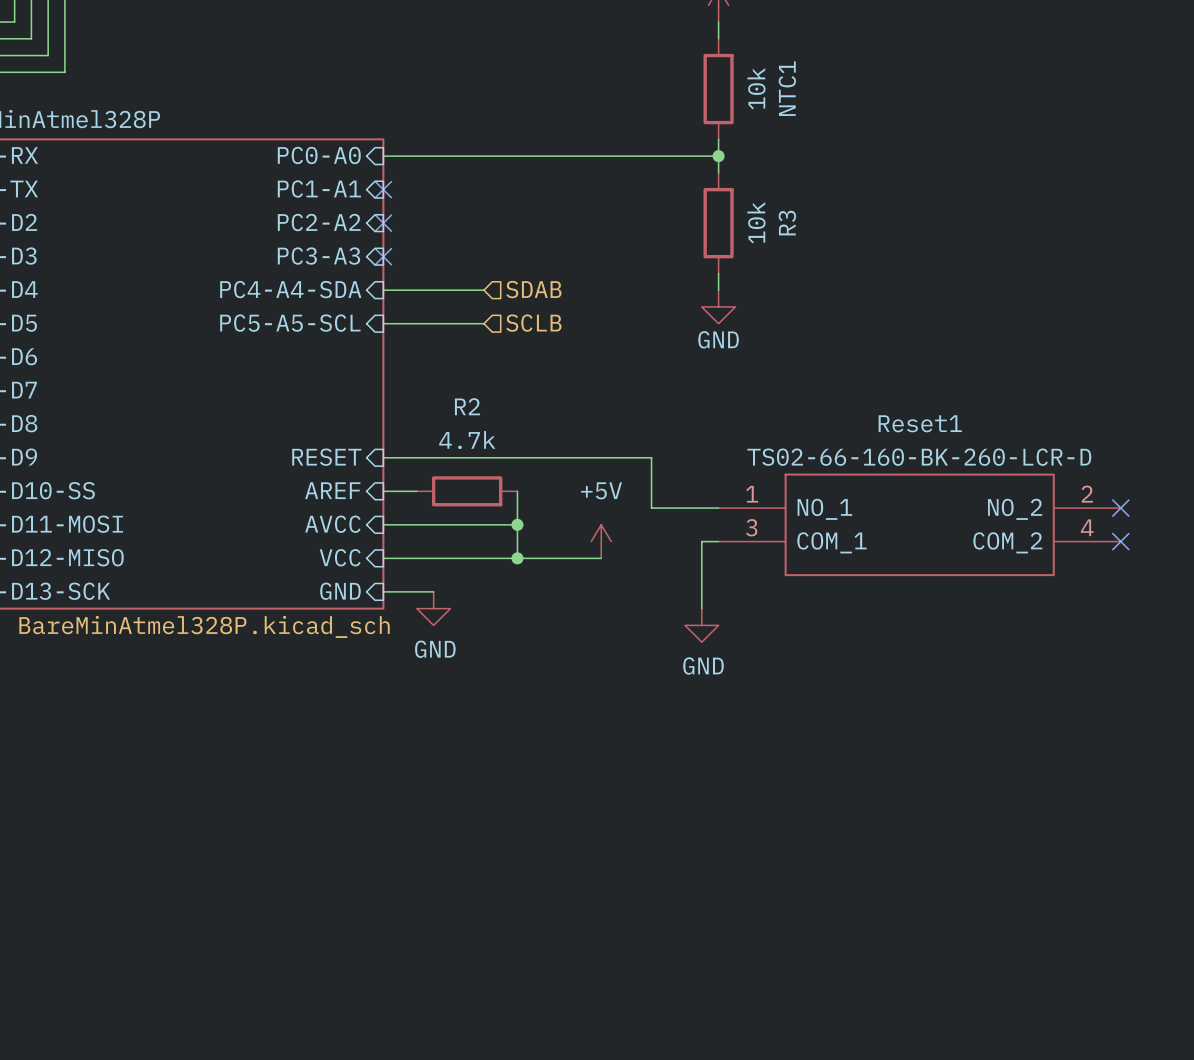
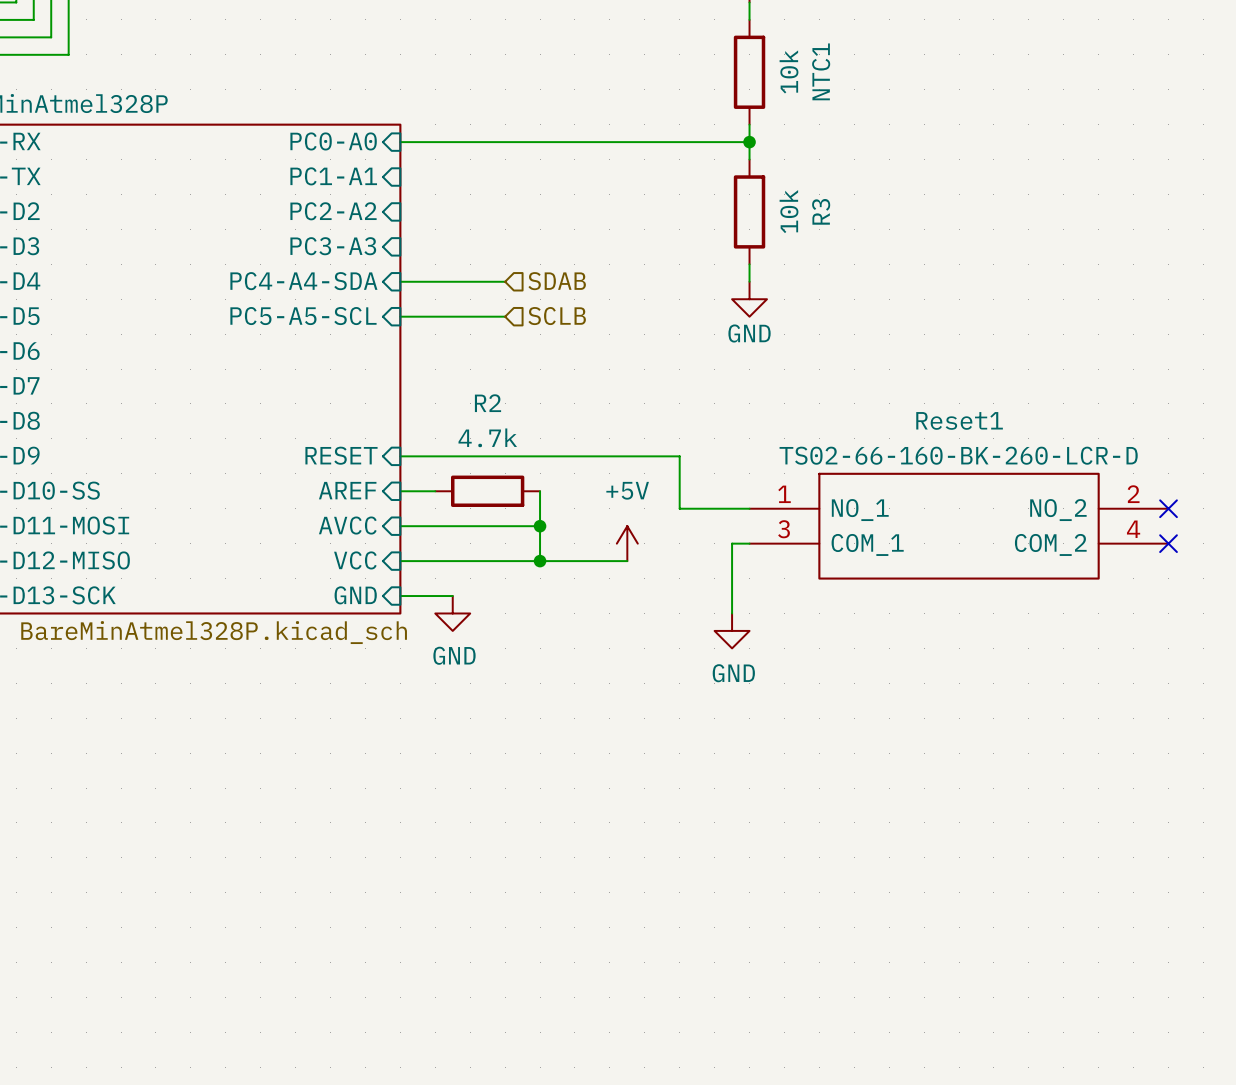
no-connect mark: (383, 189) -> none
no-connect mark: (383, 223) -> none
no-connect mark: (383, 256) -> none

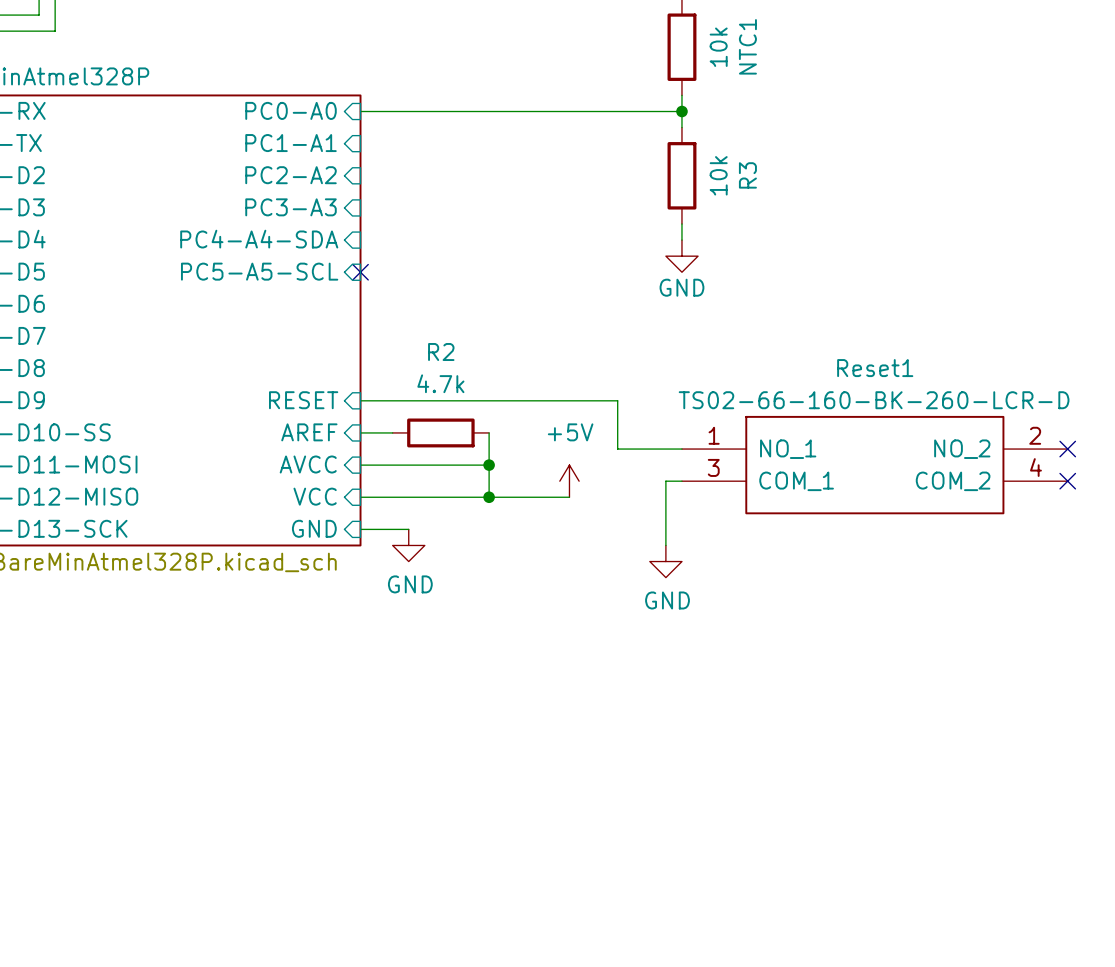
wire: (400, 281) (505, 281) -> none
hierarchical label: SDAB (557, 281) -> none
wire: (400, 316) (505, 316) -> none
no-connect mark: none -> (360, 272)
hierarchical label: SCLB (557, 316) -> none

